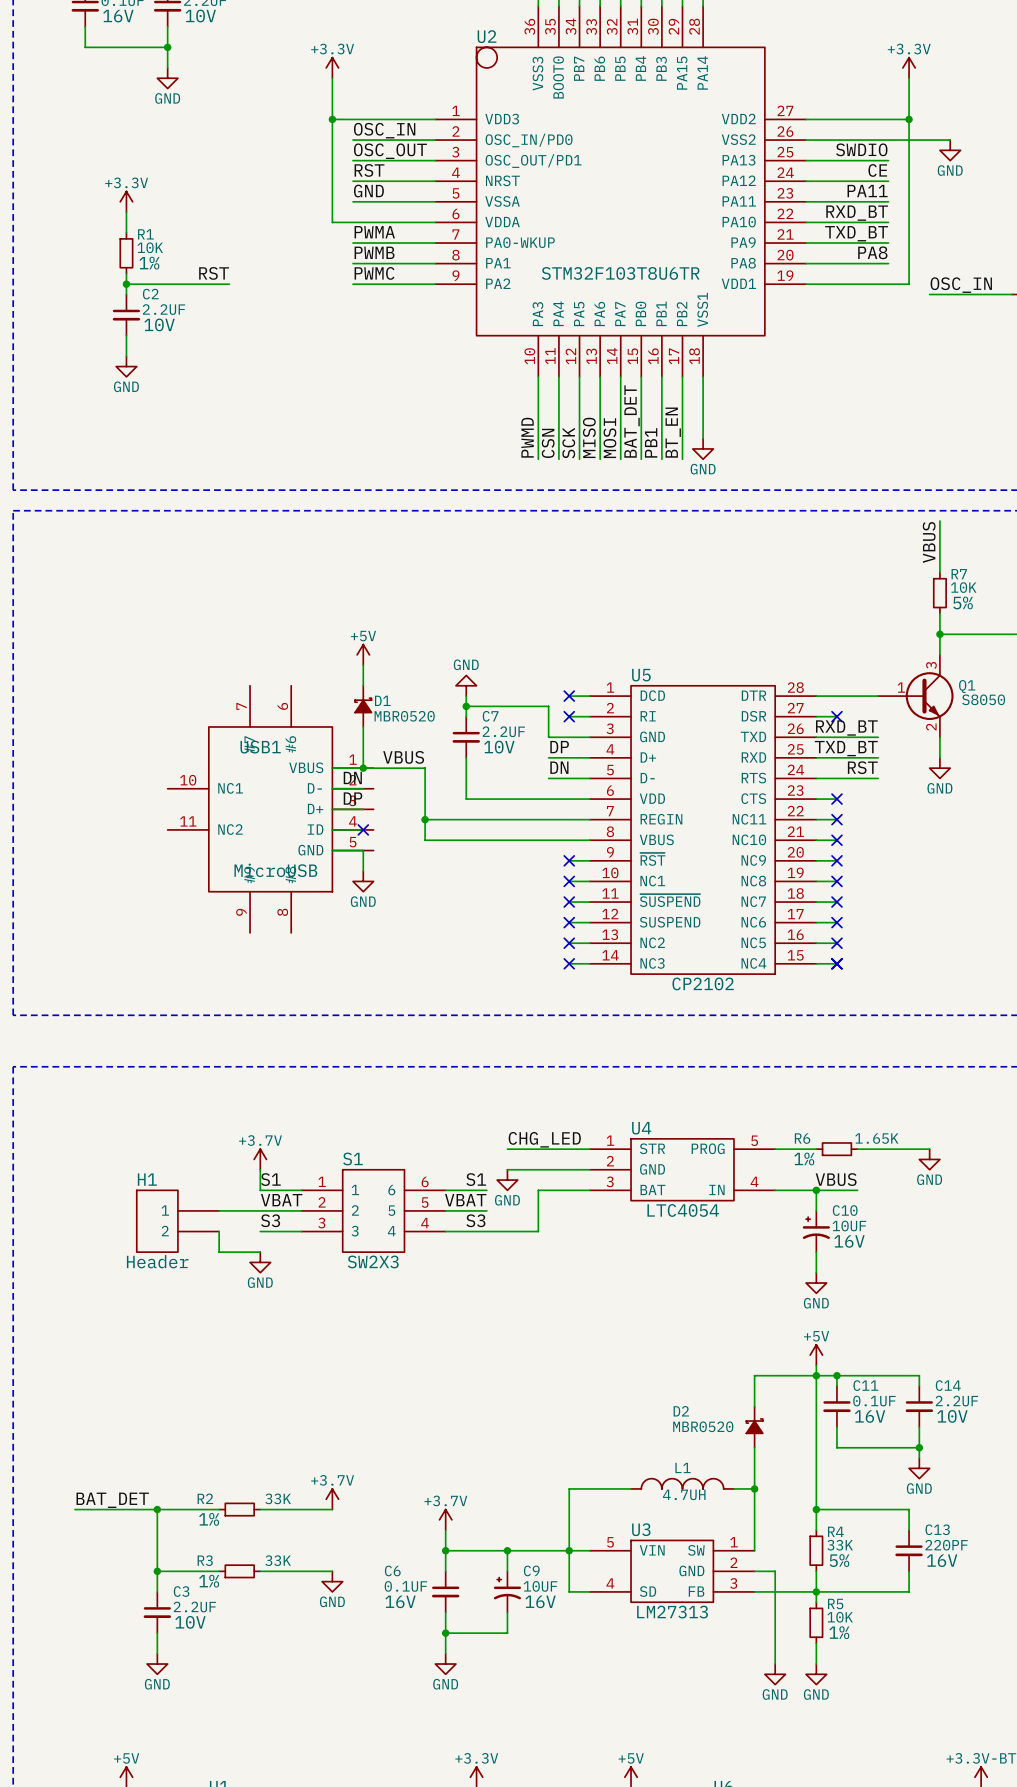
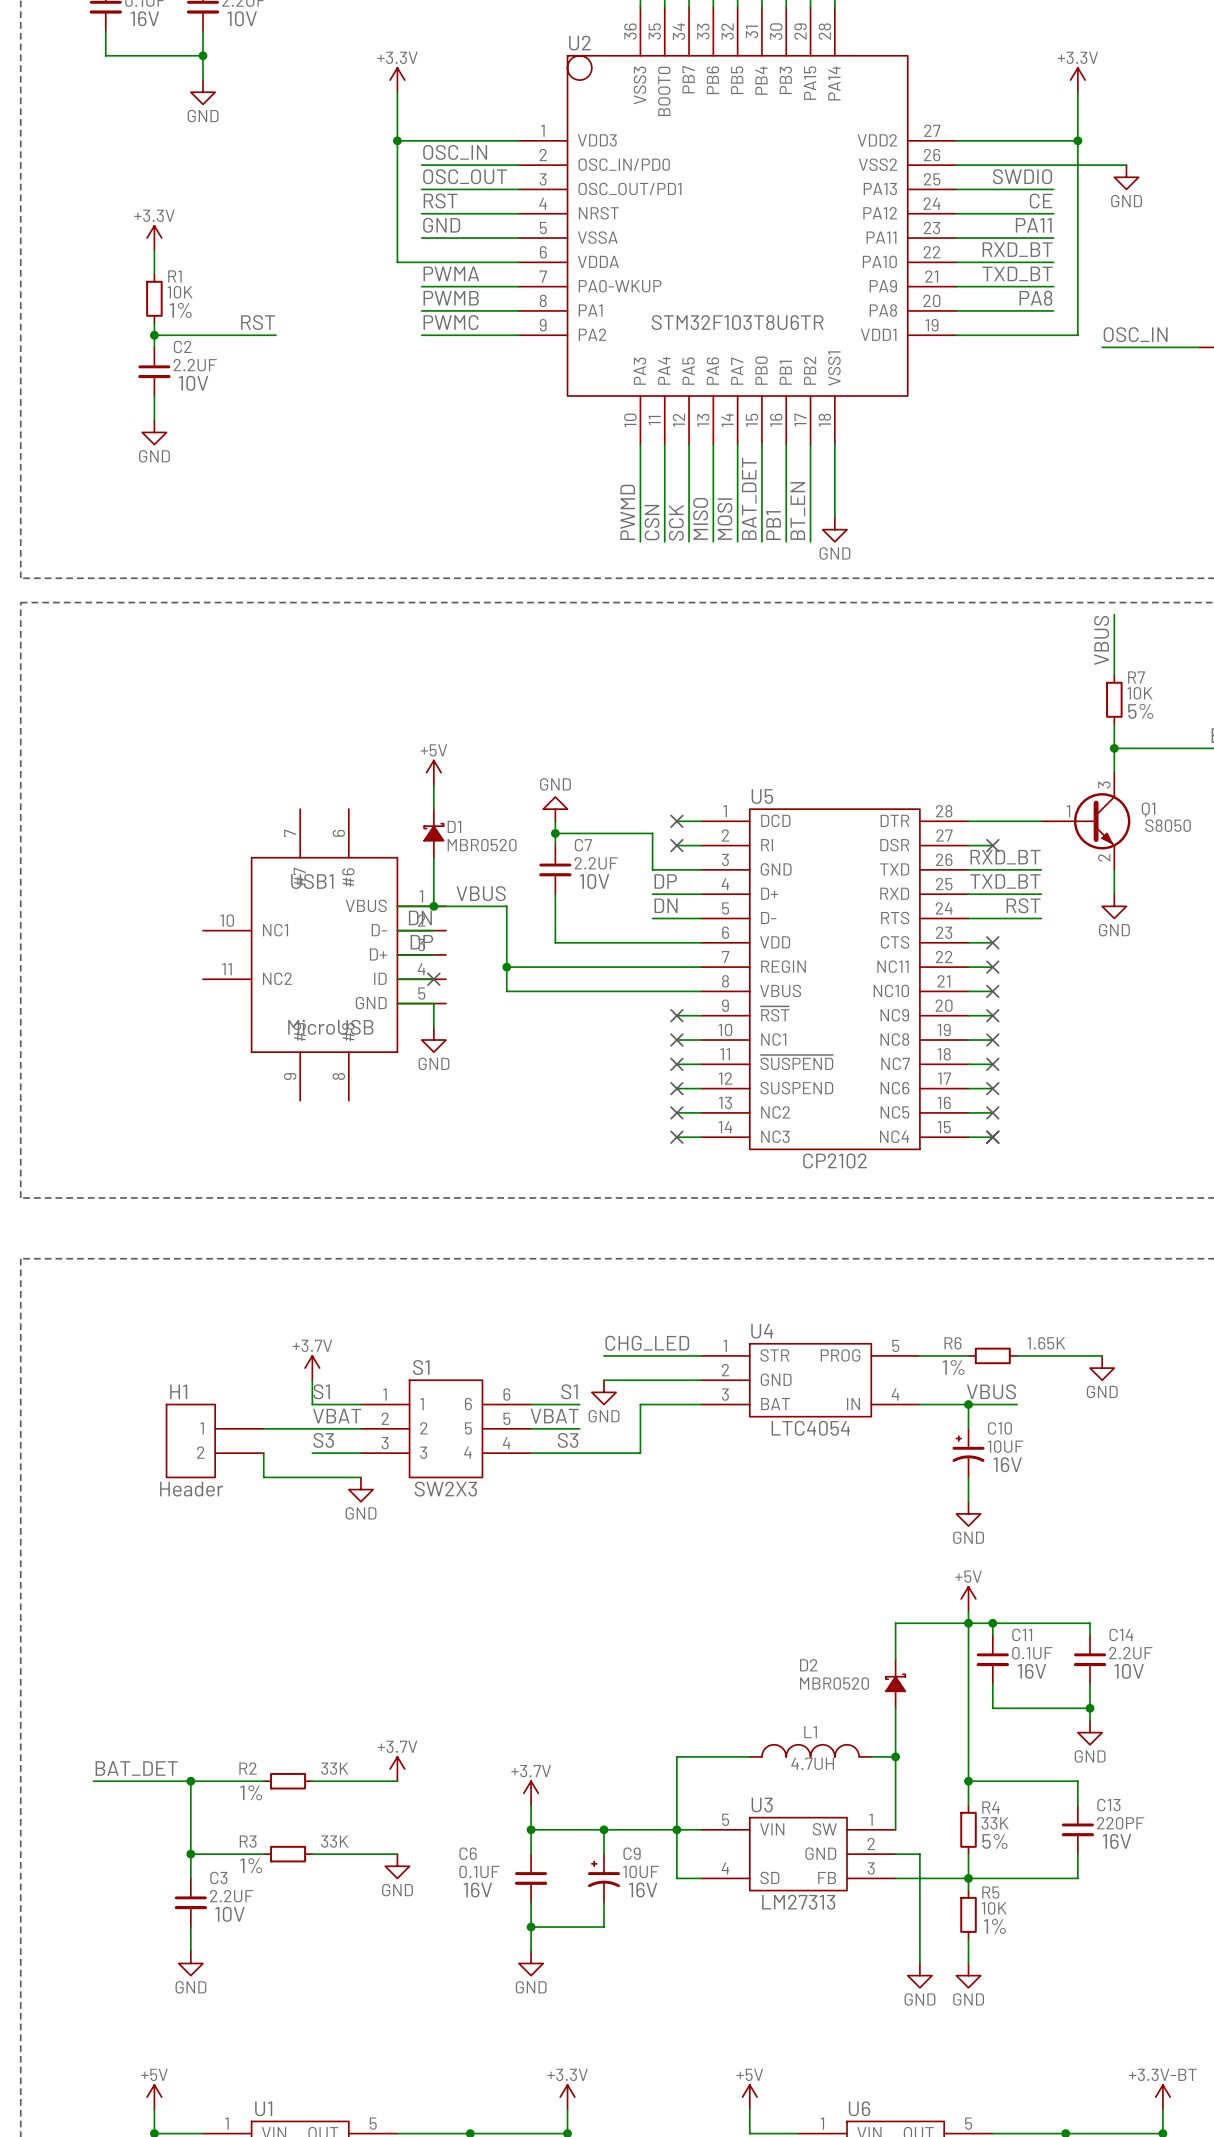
wire: none -> (312, 1477) (360, 1477)
power symbol position: GND (260, 1262) -> GND (360, 1489)

